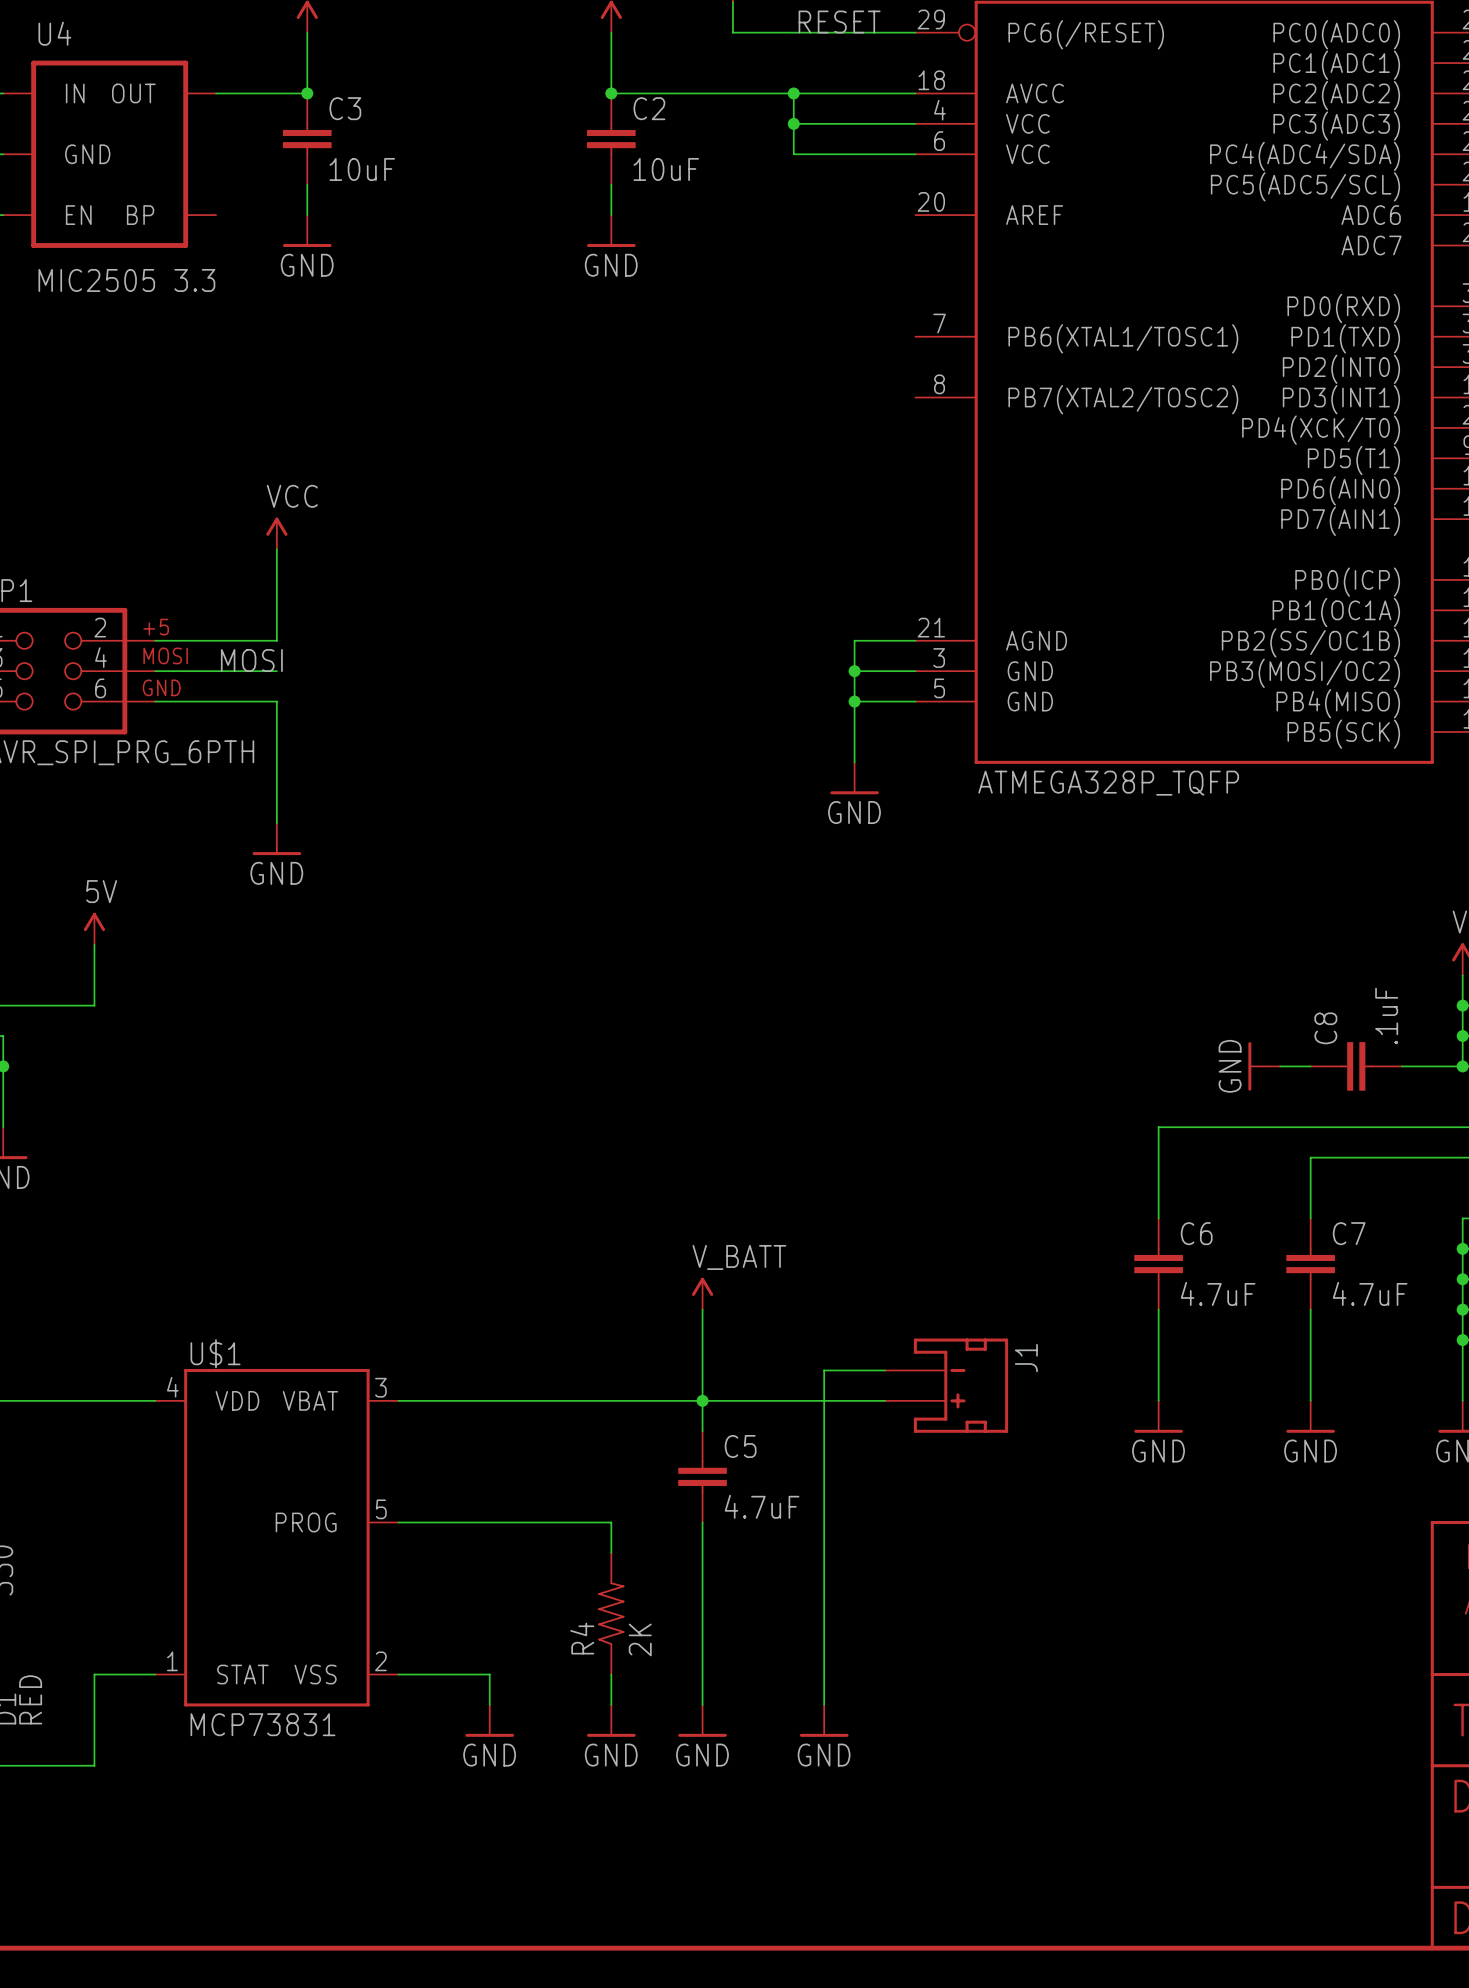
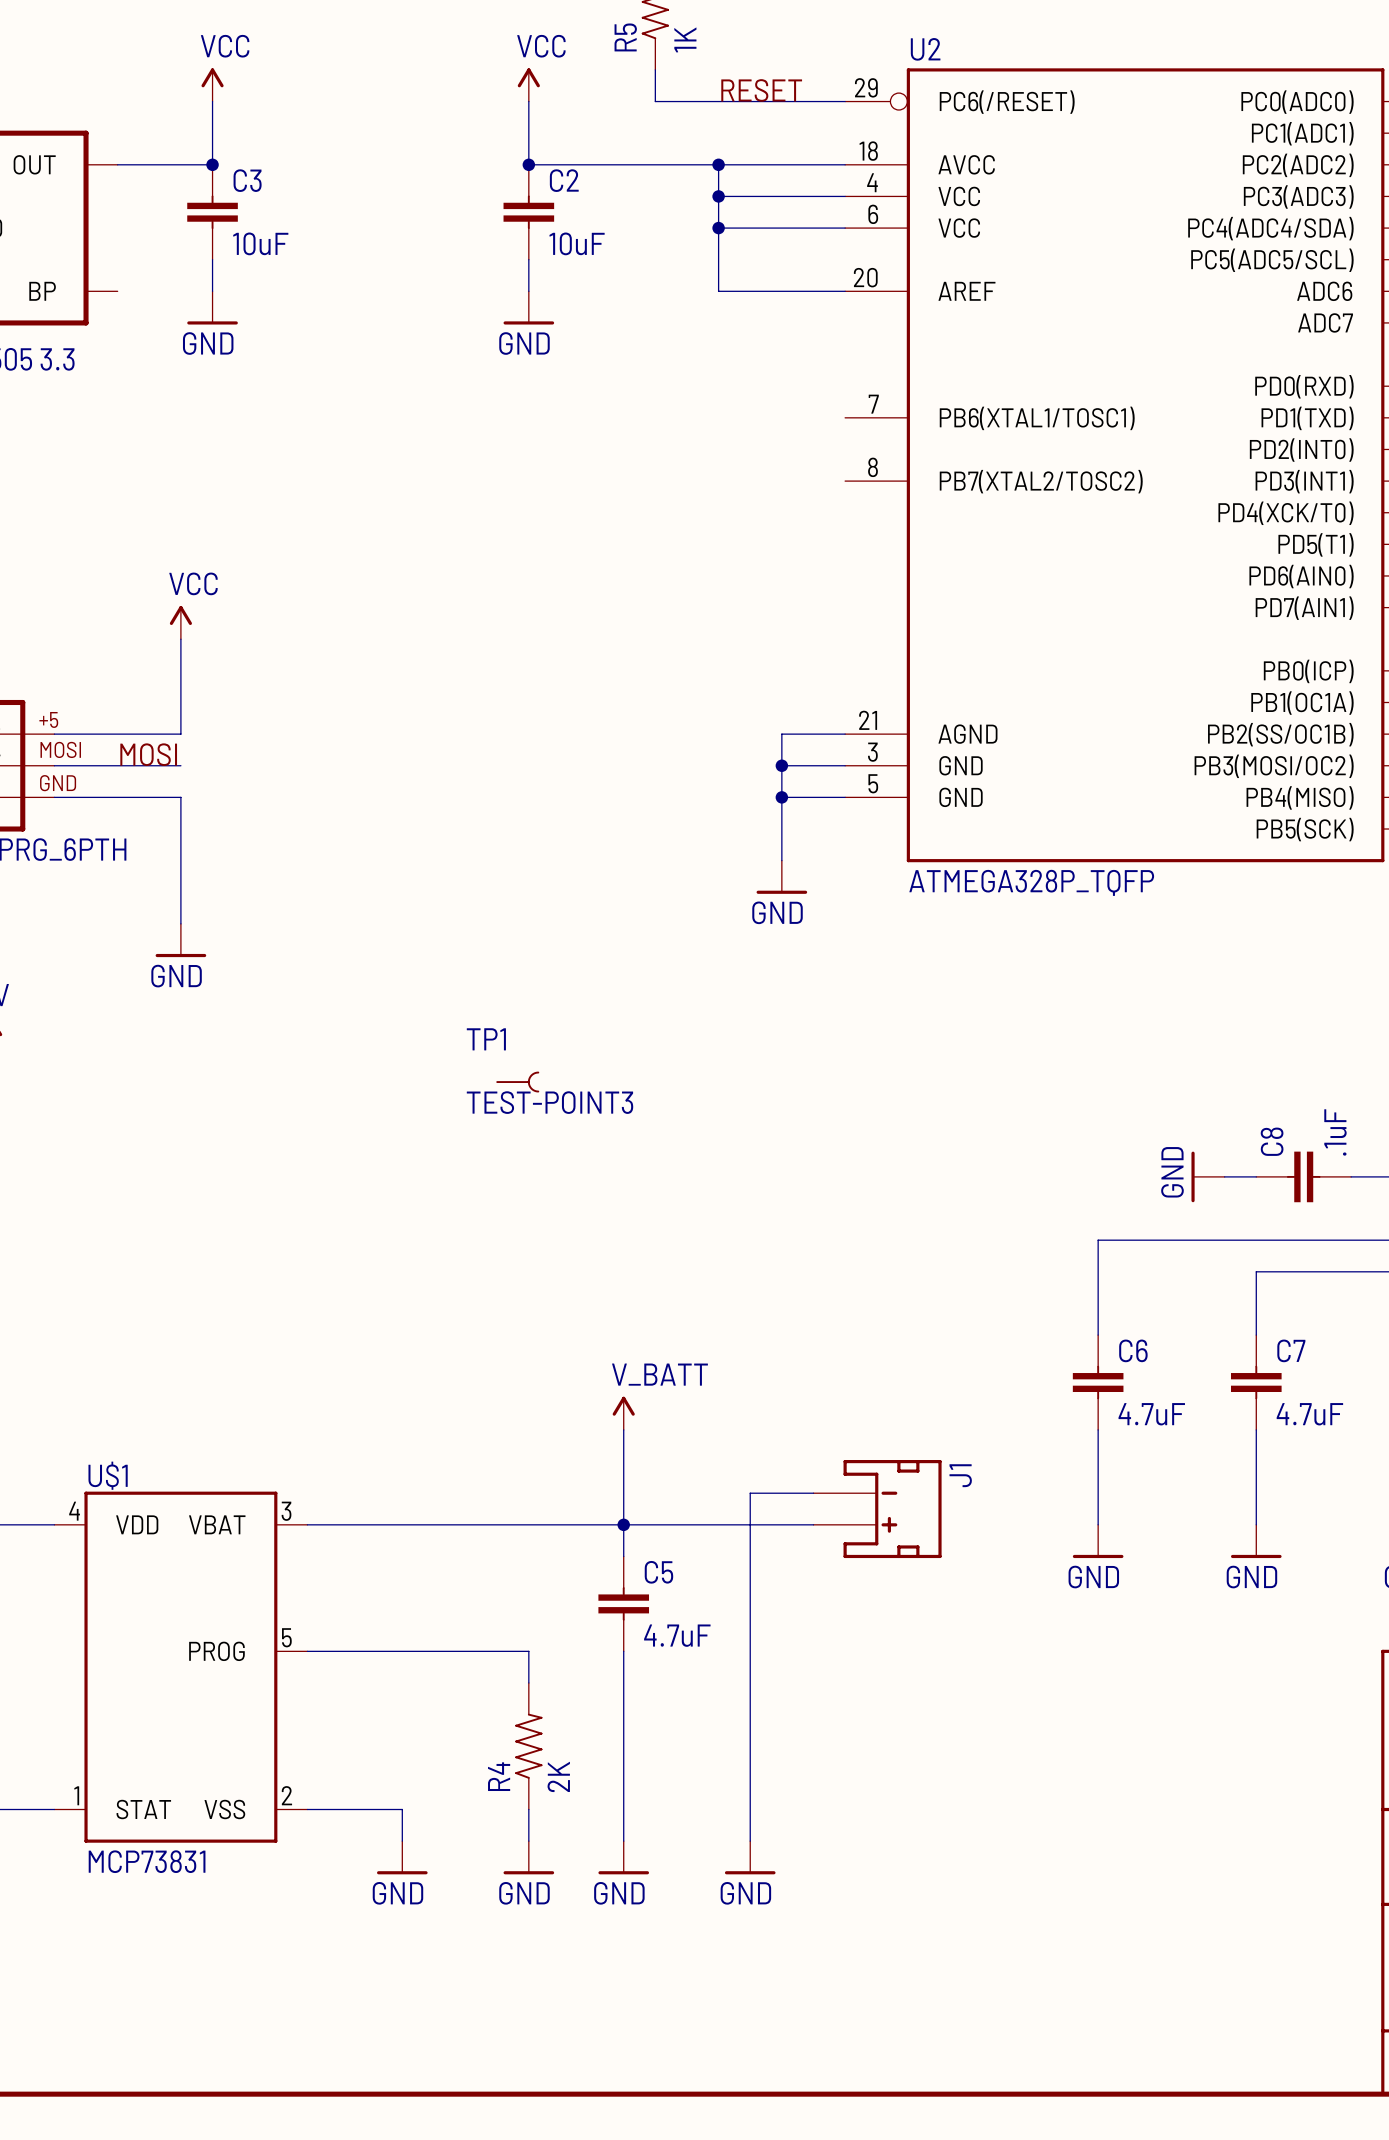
wire: none -> (718, 228) (718, 291) (845, 291)
junction: none -> (718, 228)
TP1: none -> TEST-POINT3 (517, 1082)

